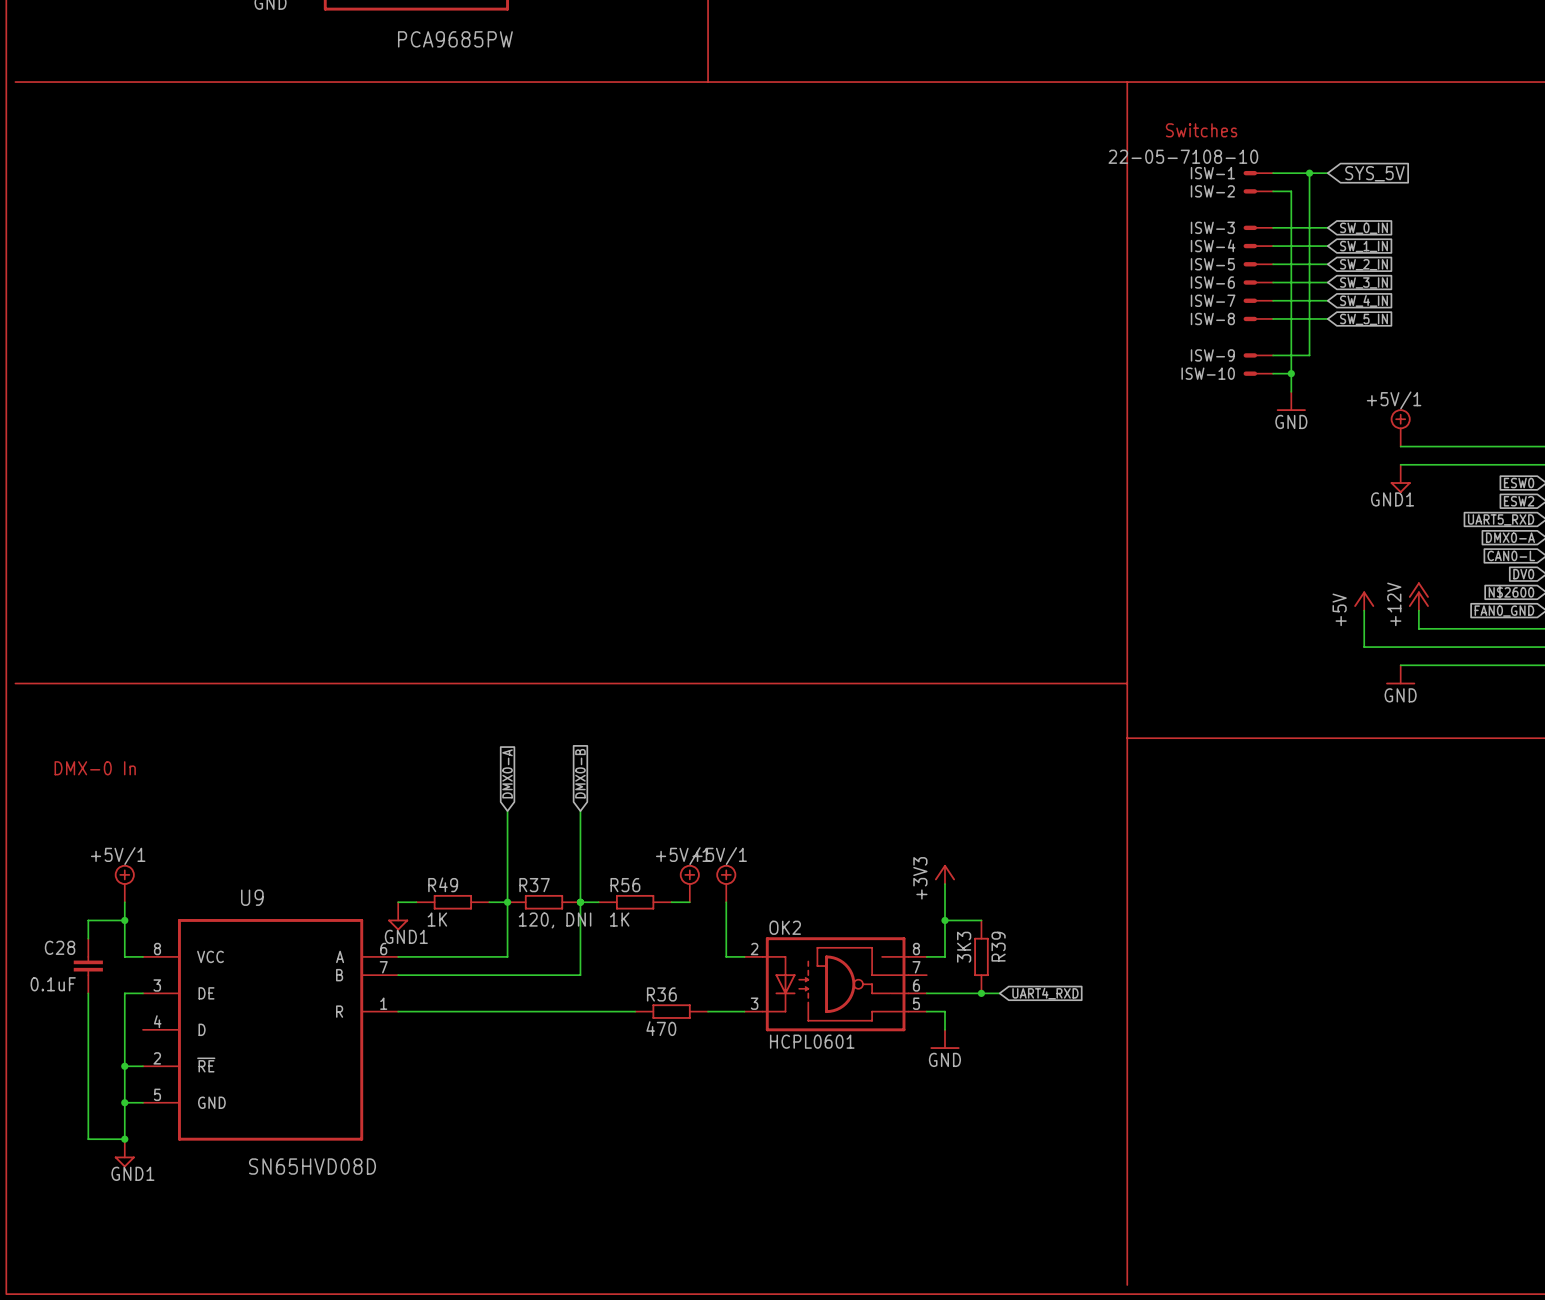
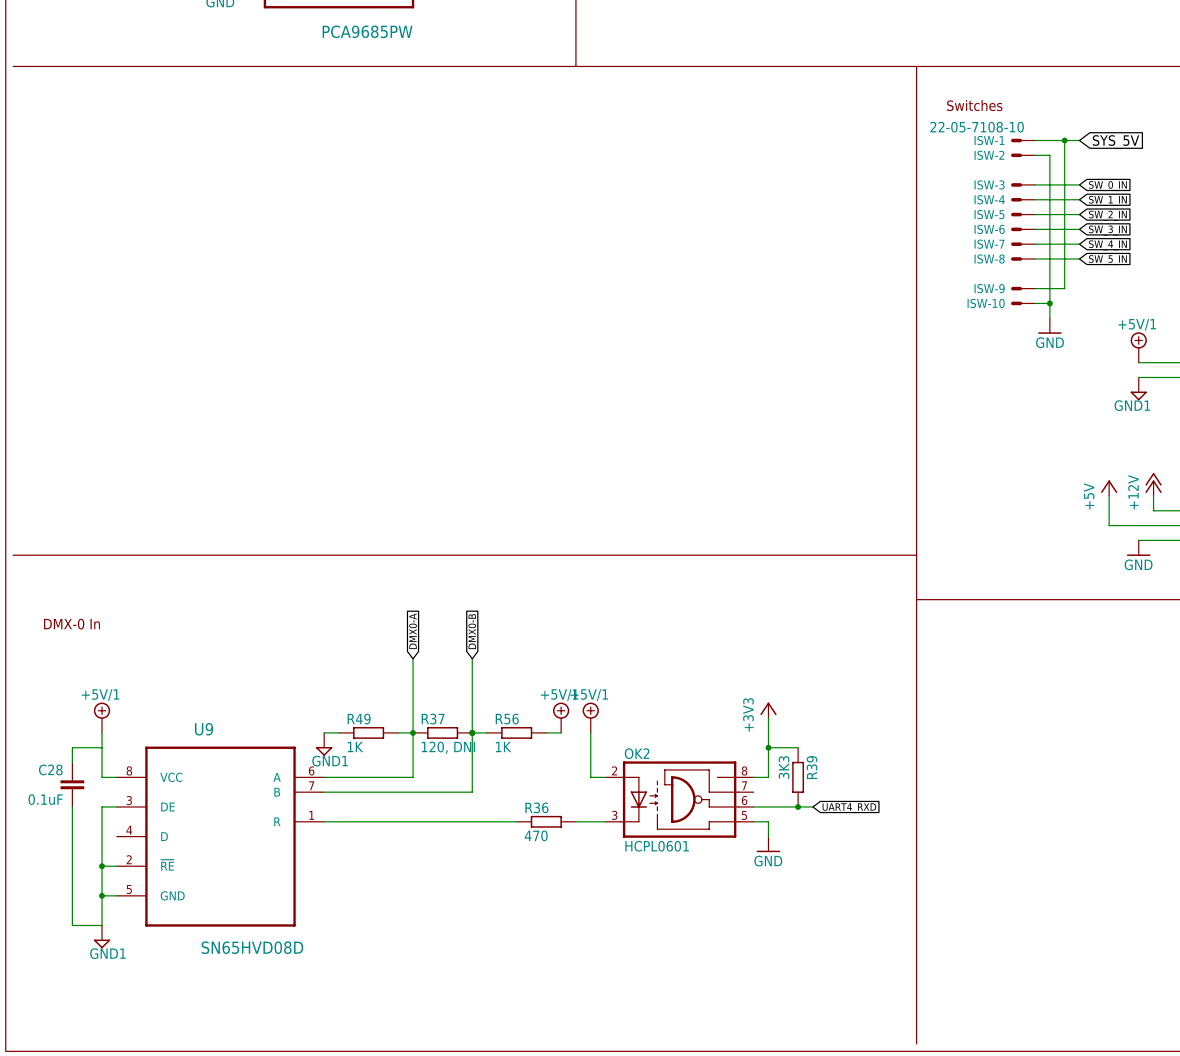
junction: (124, 920) -> none
junction: (124, 1139) -> none

